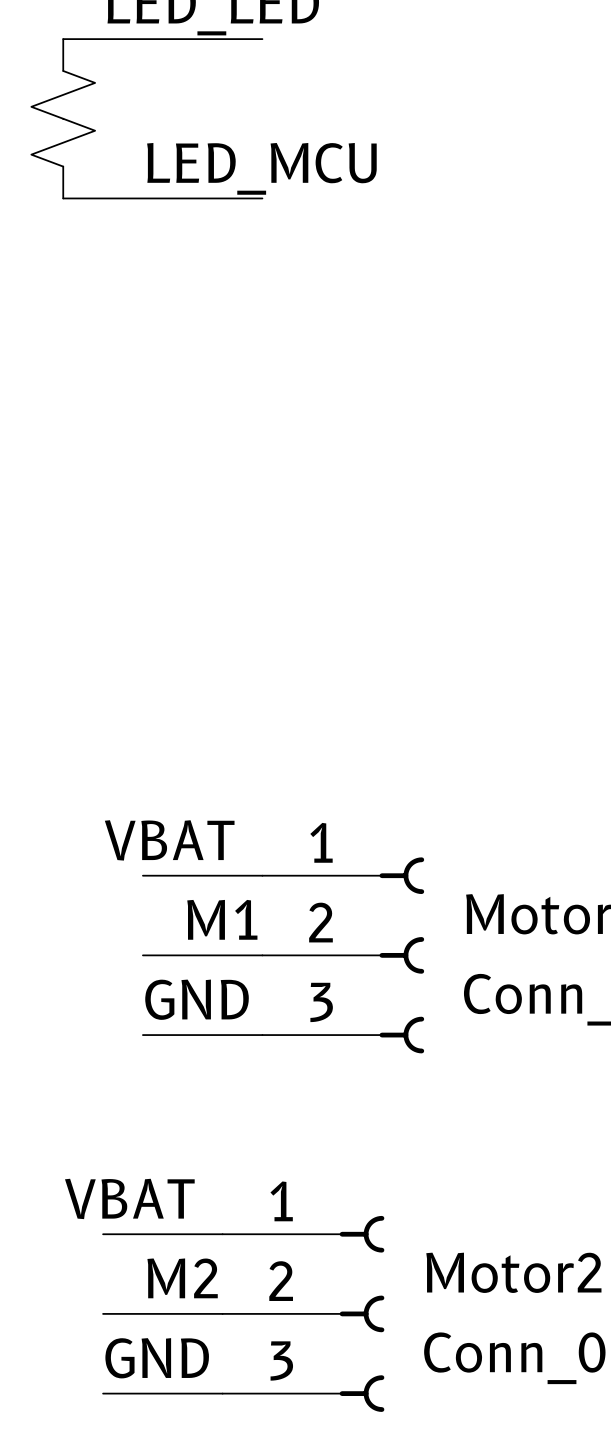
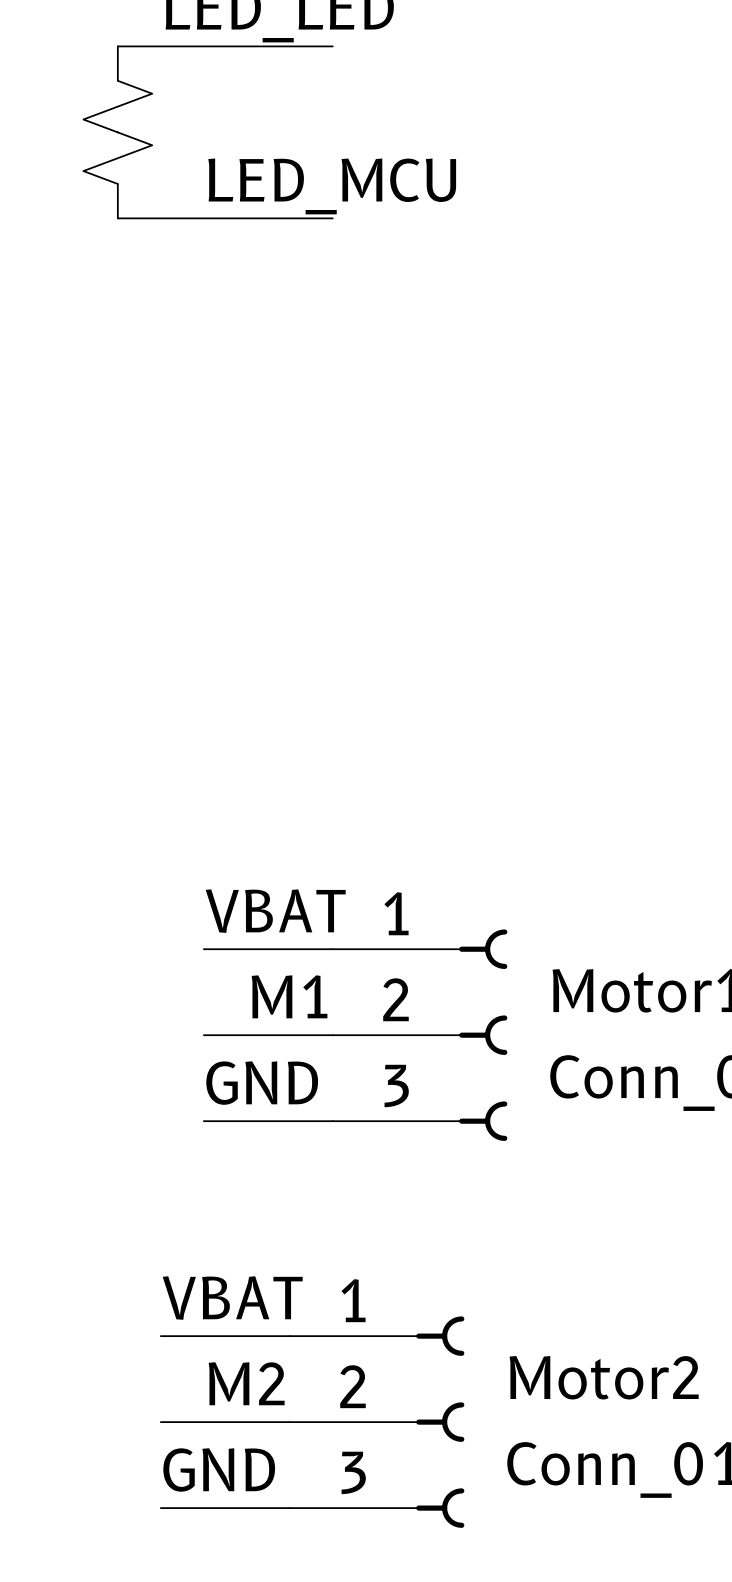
label position: VBAT (169, 840) -> VBAT (275, 911)
label position: VBAT (129, 1198) -> VBAT (232, 1298)

